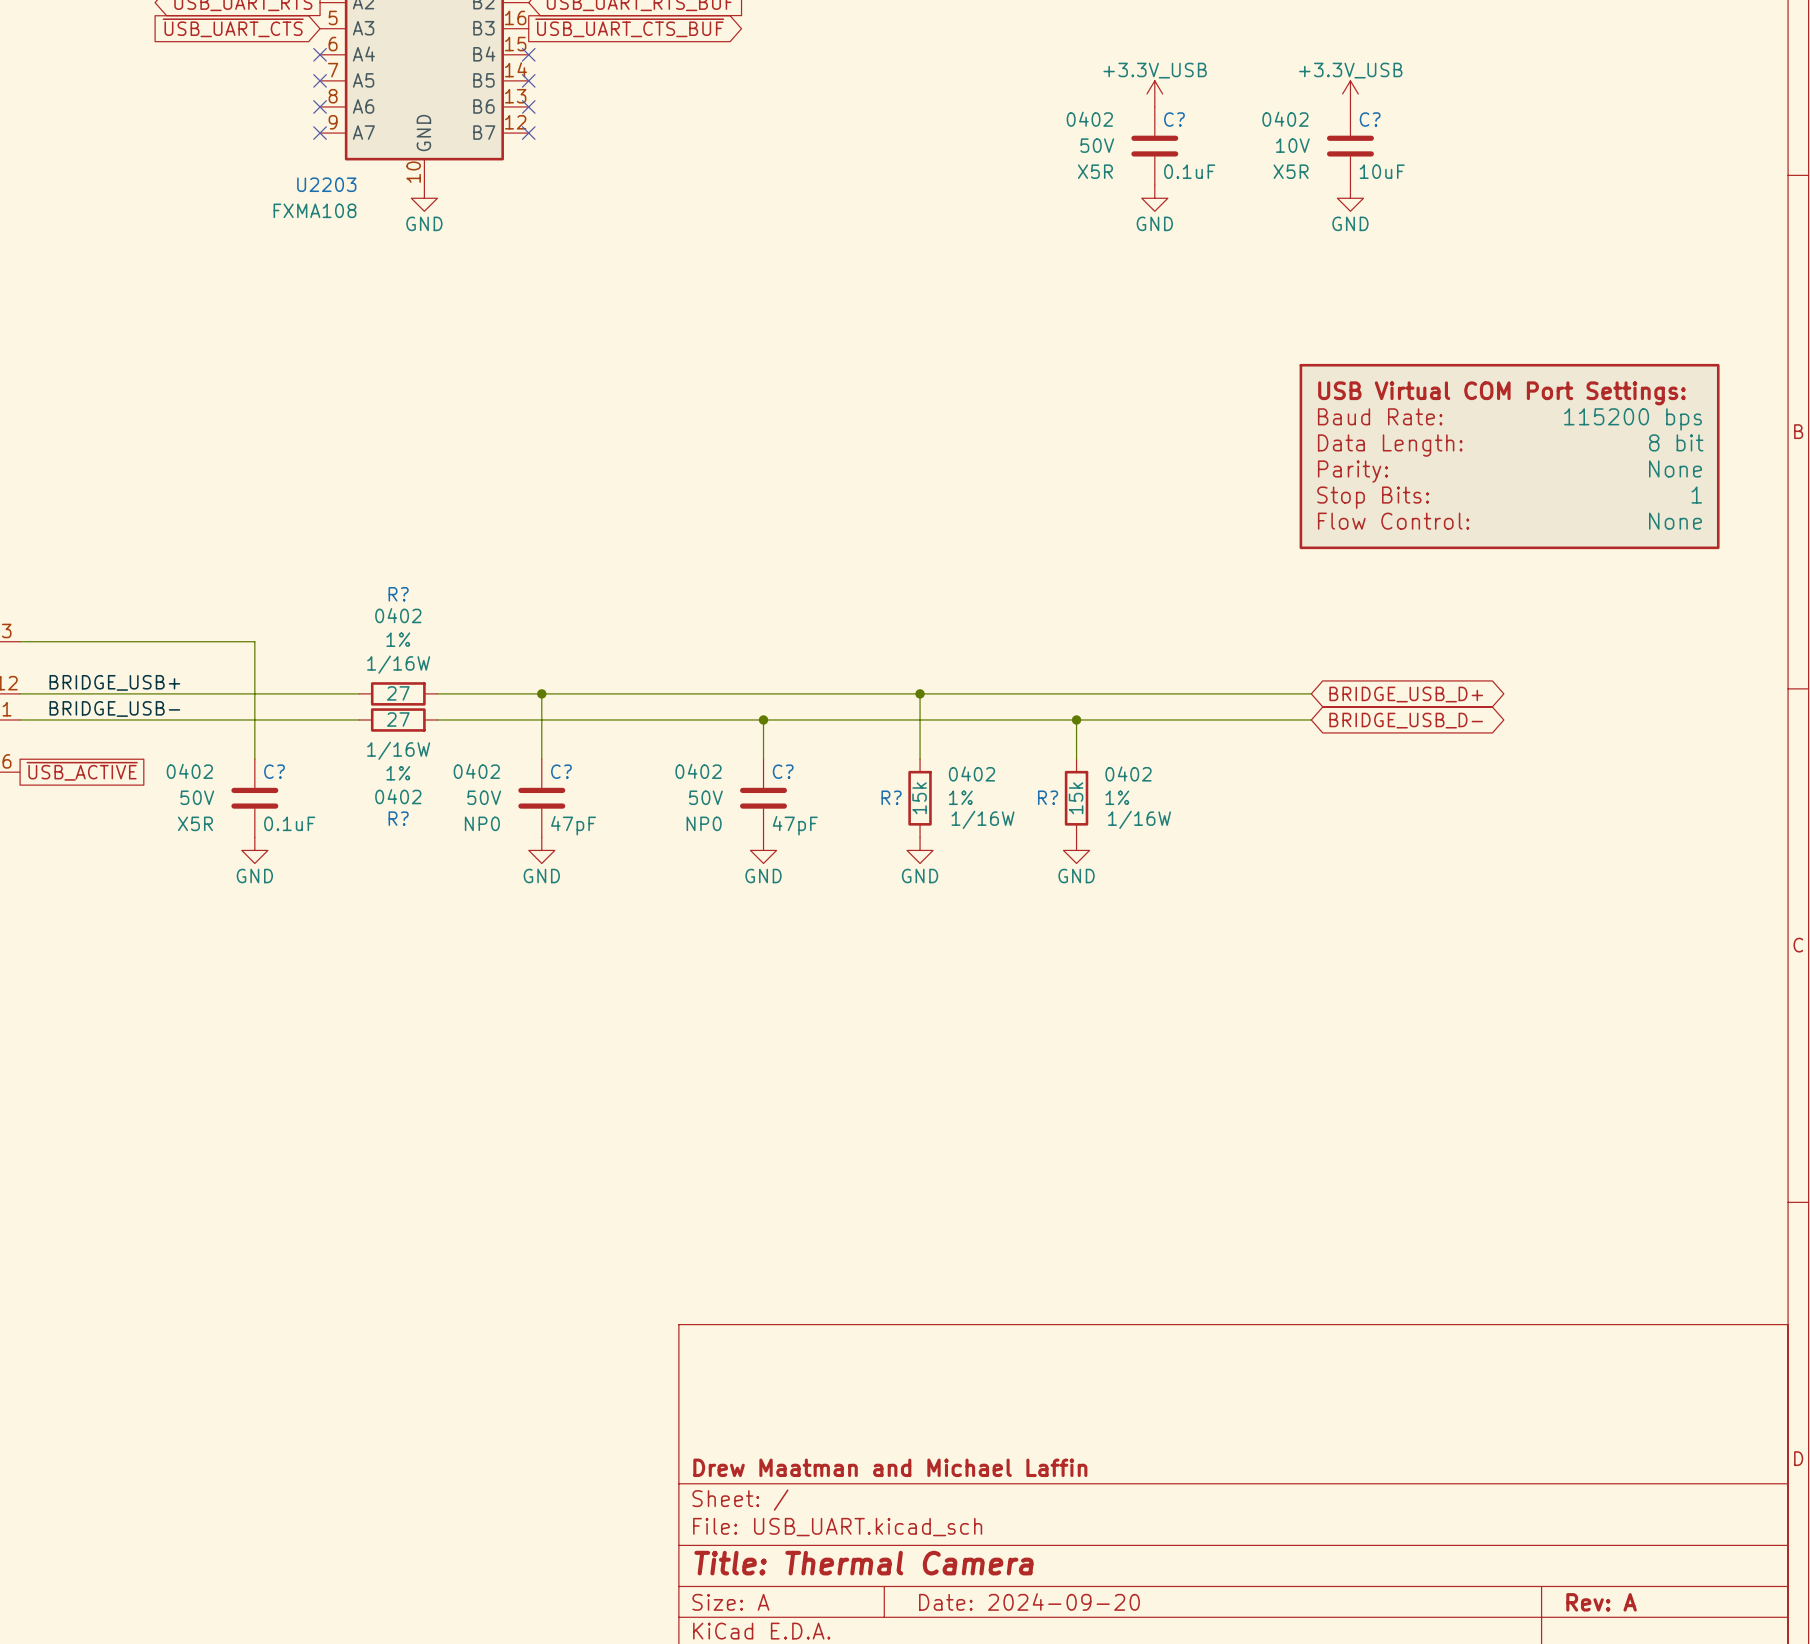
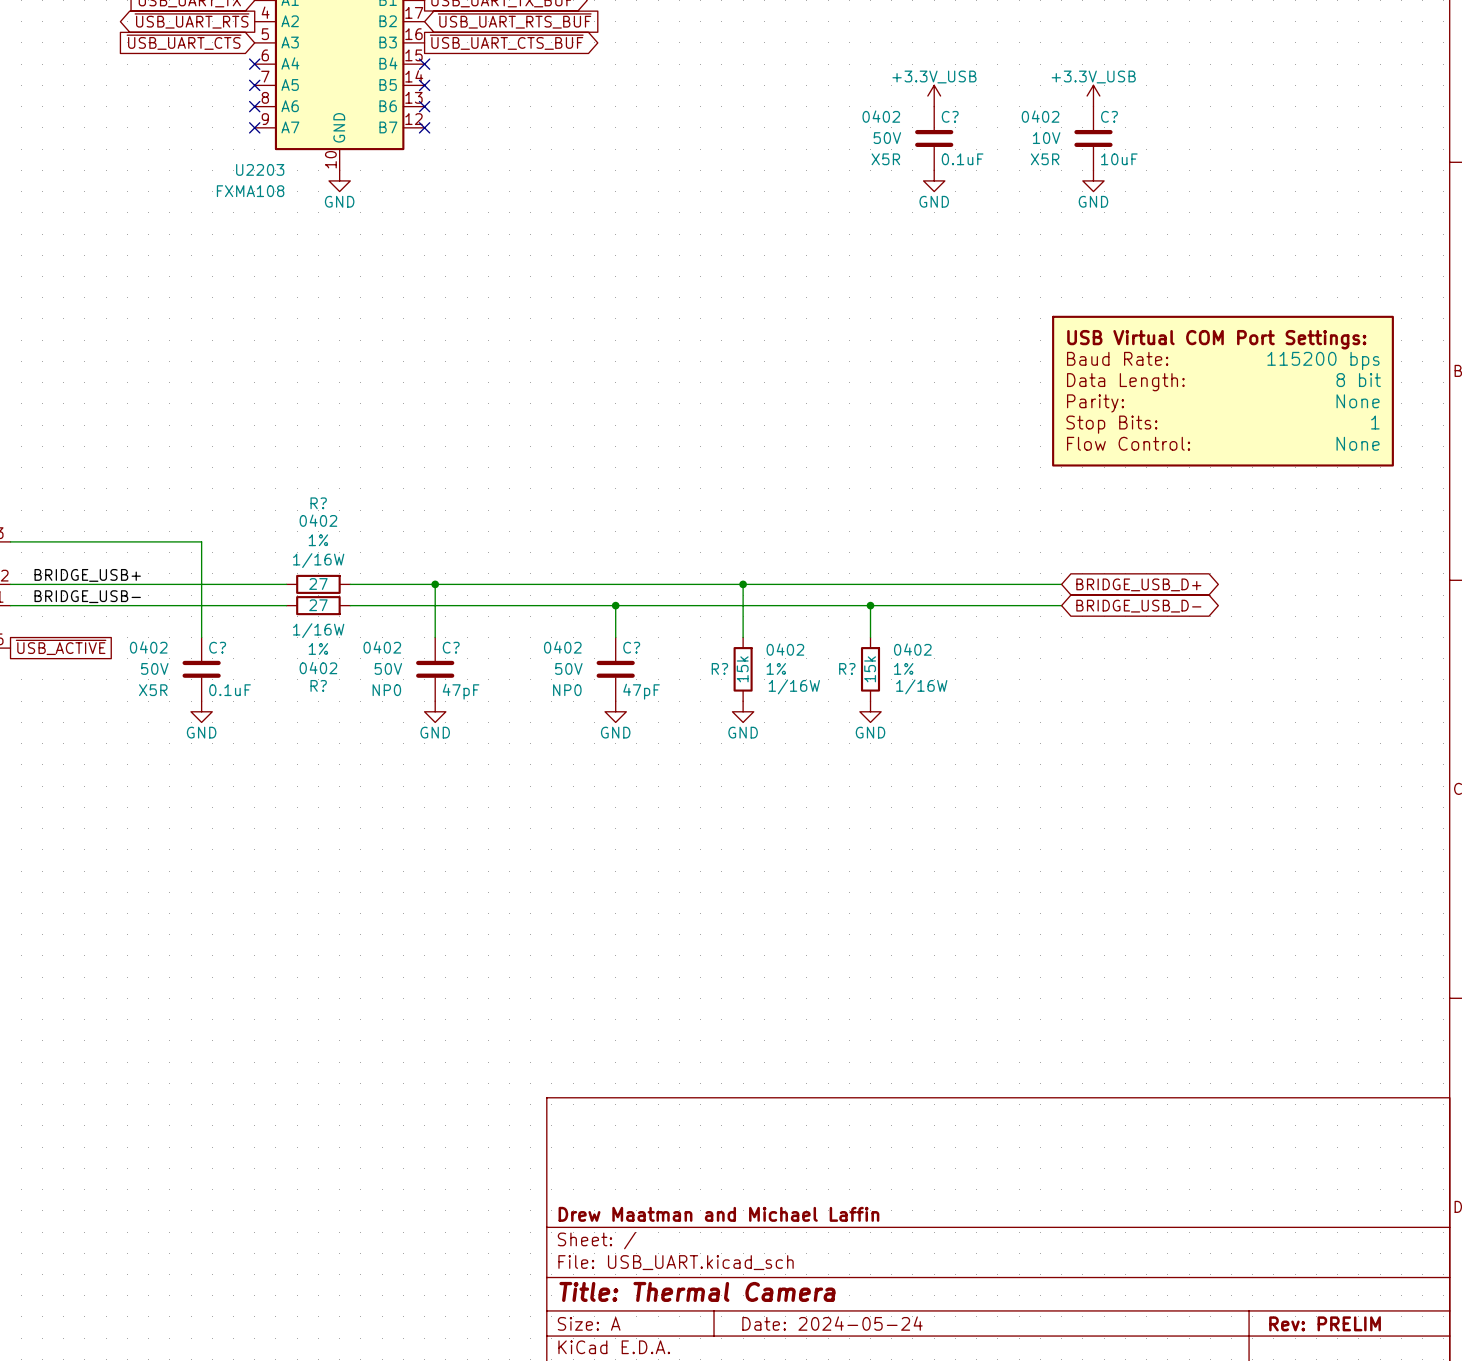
title block: Date: 2024-09-20 (1029, 1601) -> Date: 2024-05-24 (832, 1323)
title block: Rev: A (1601, 1602) -> Rev: PRELIM (1325, 1323)

